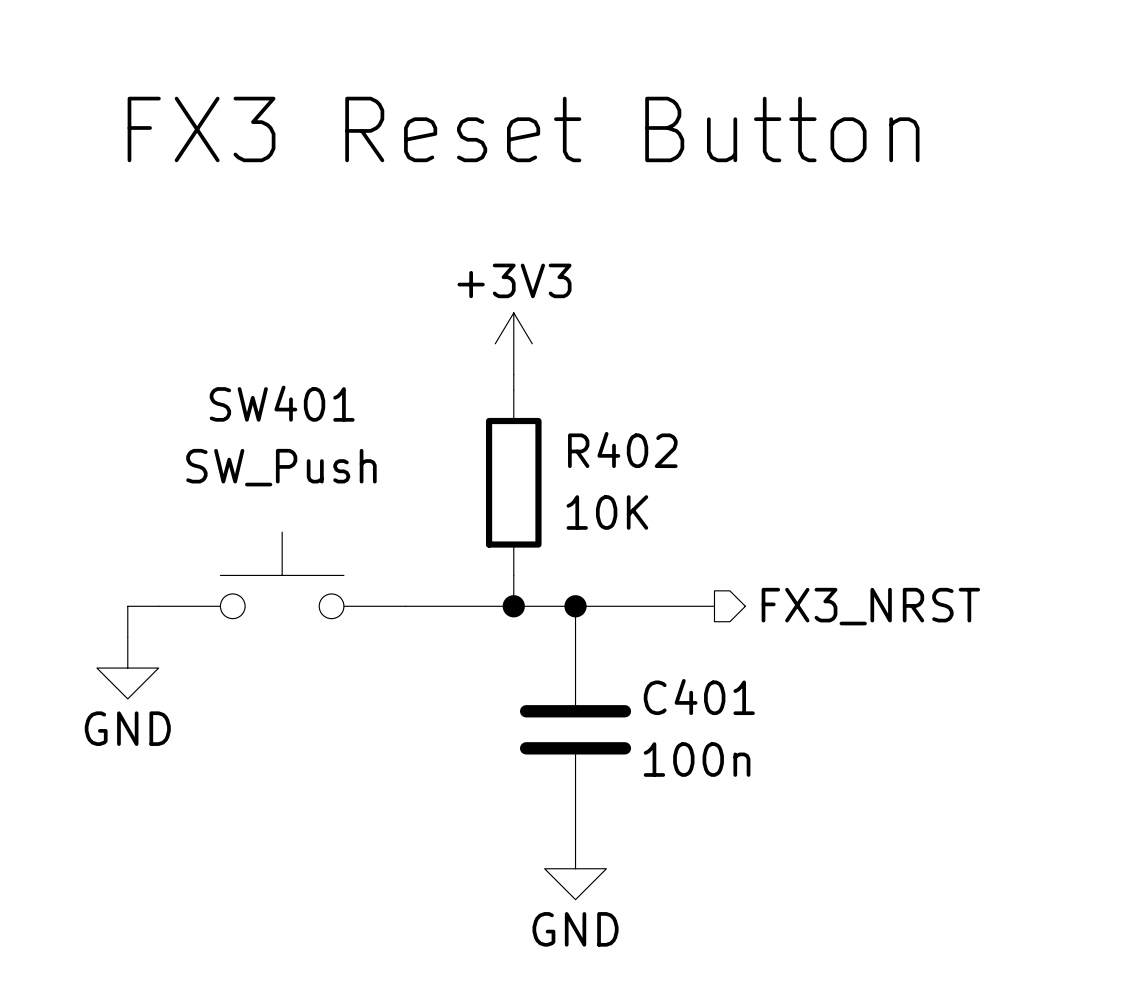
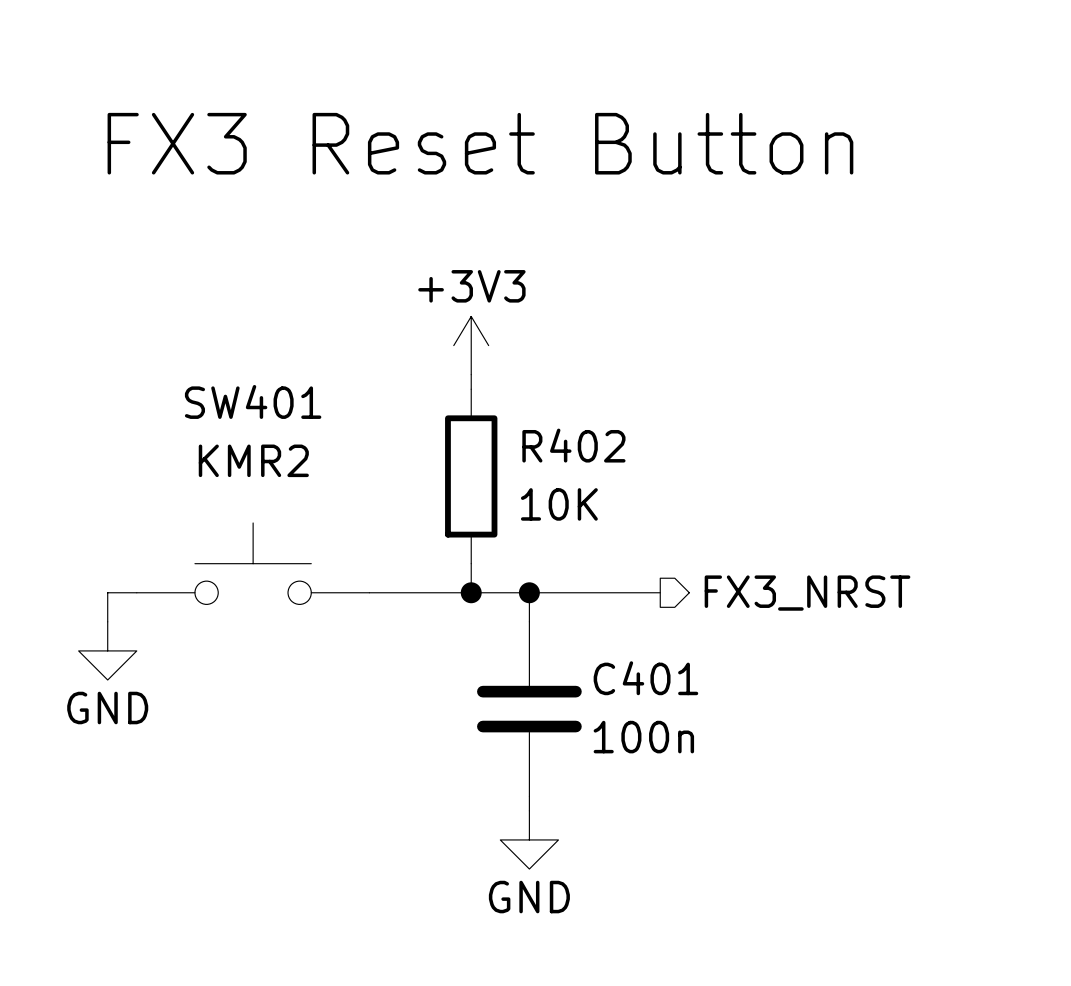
SW401 value: SW_Push (281, 467) -> KMR2 (253, 460)

